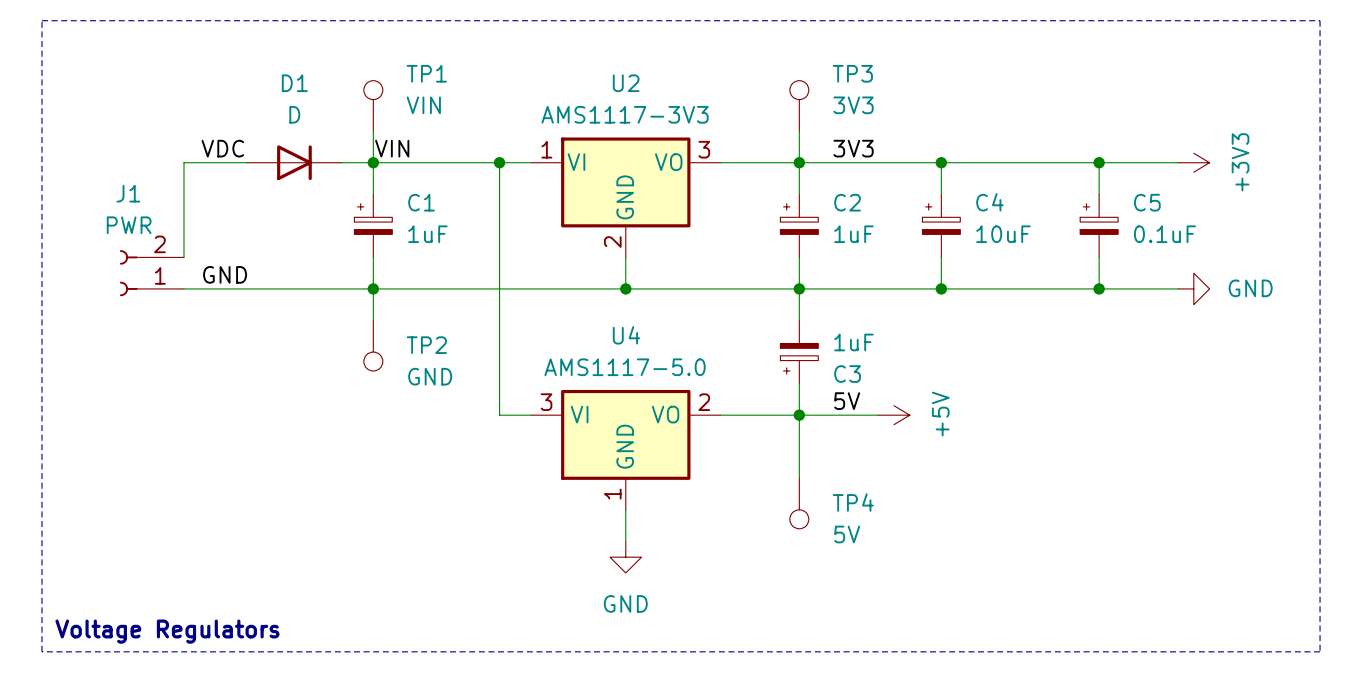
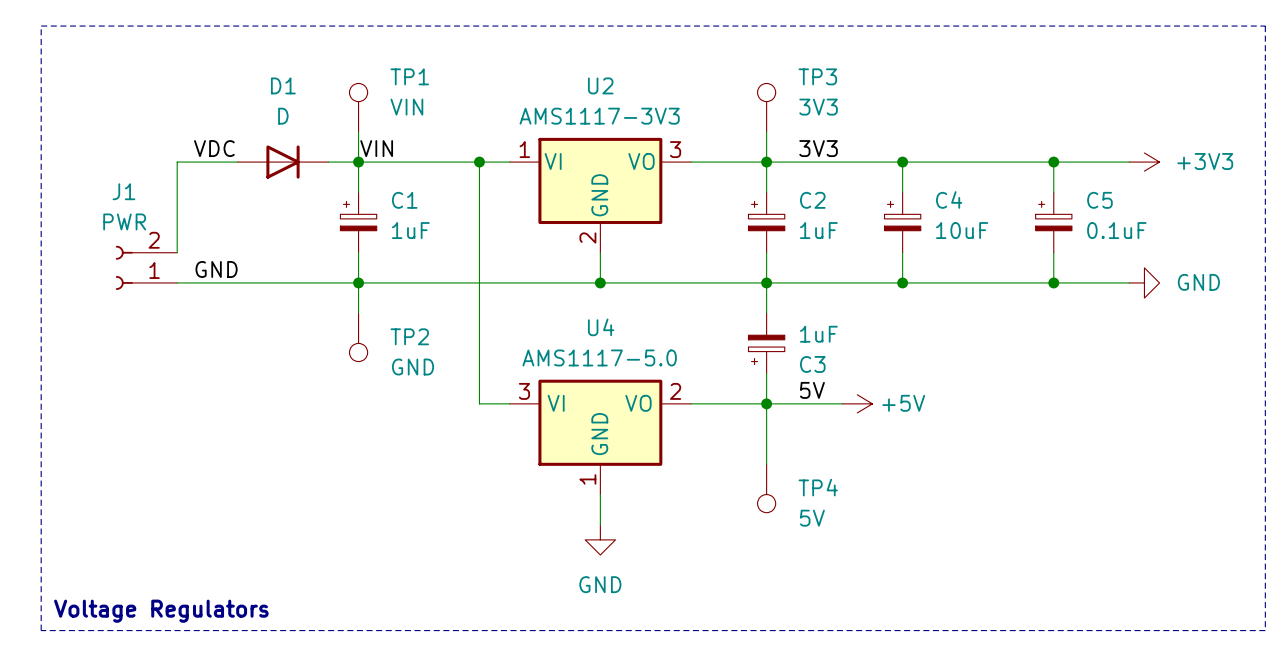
power symbol text rotation: 0° (1240, 162) -> 90° clockwise (1205, 161)
power symbol text rotation: 0° (940, 414) -> 90° clockwise (903, 403)

